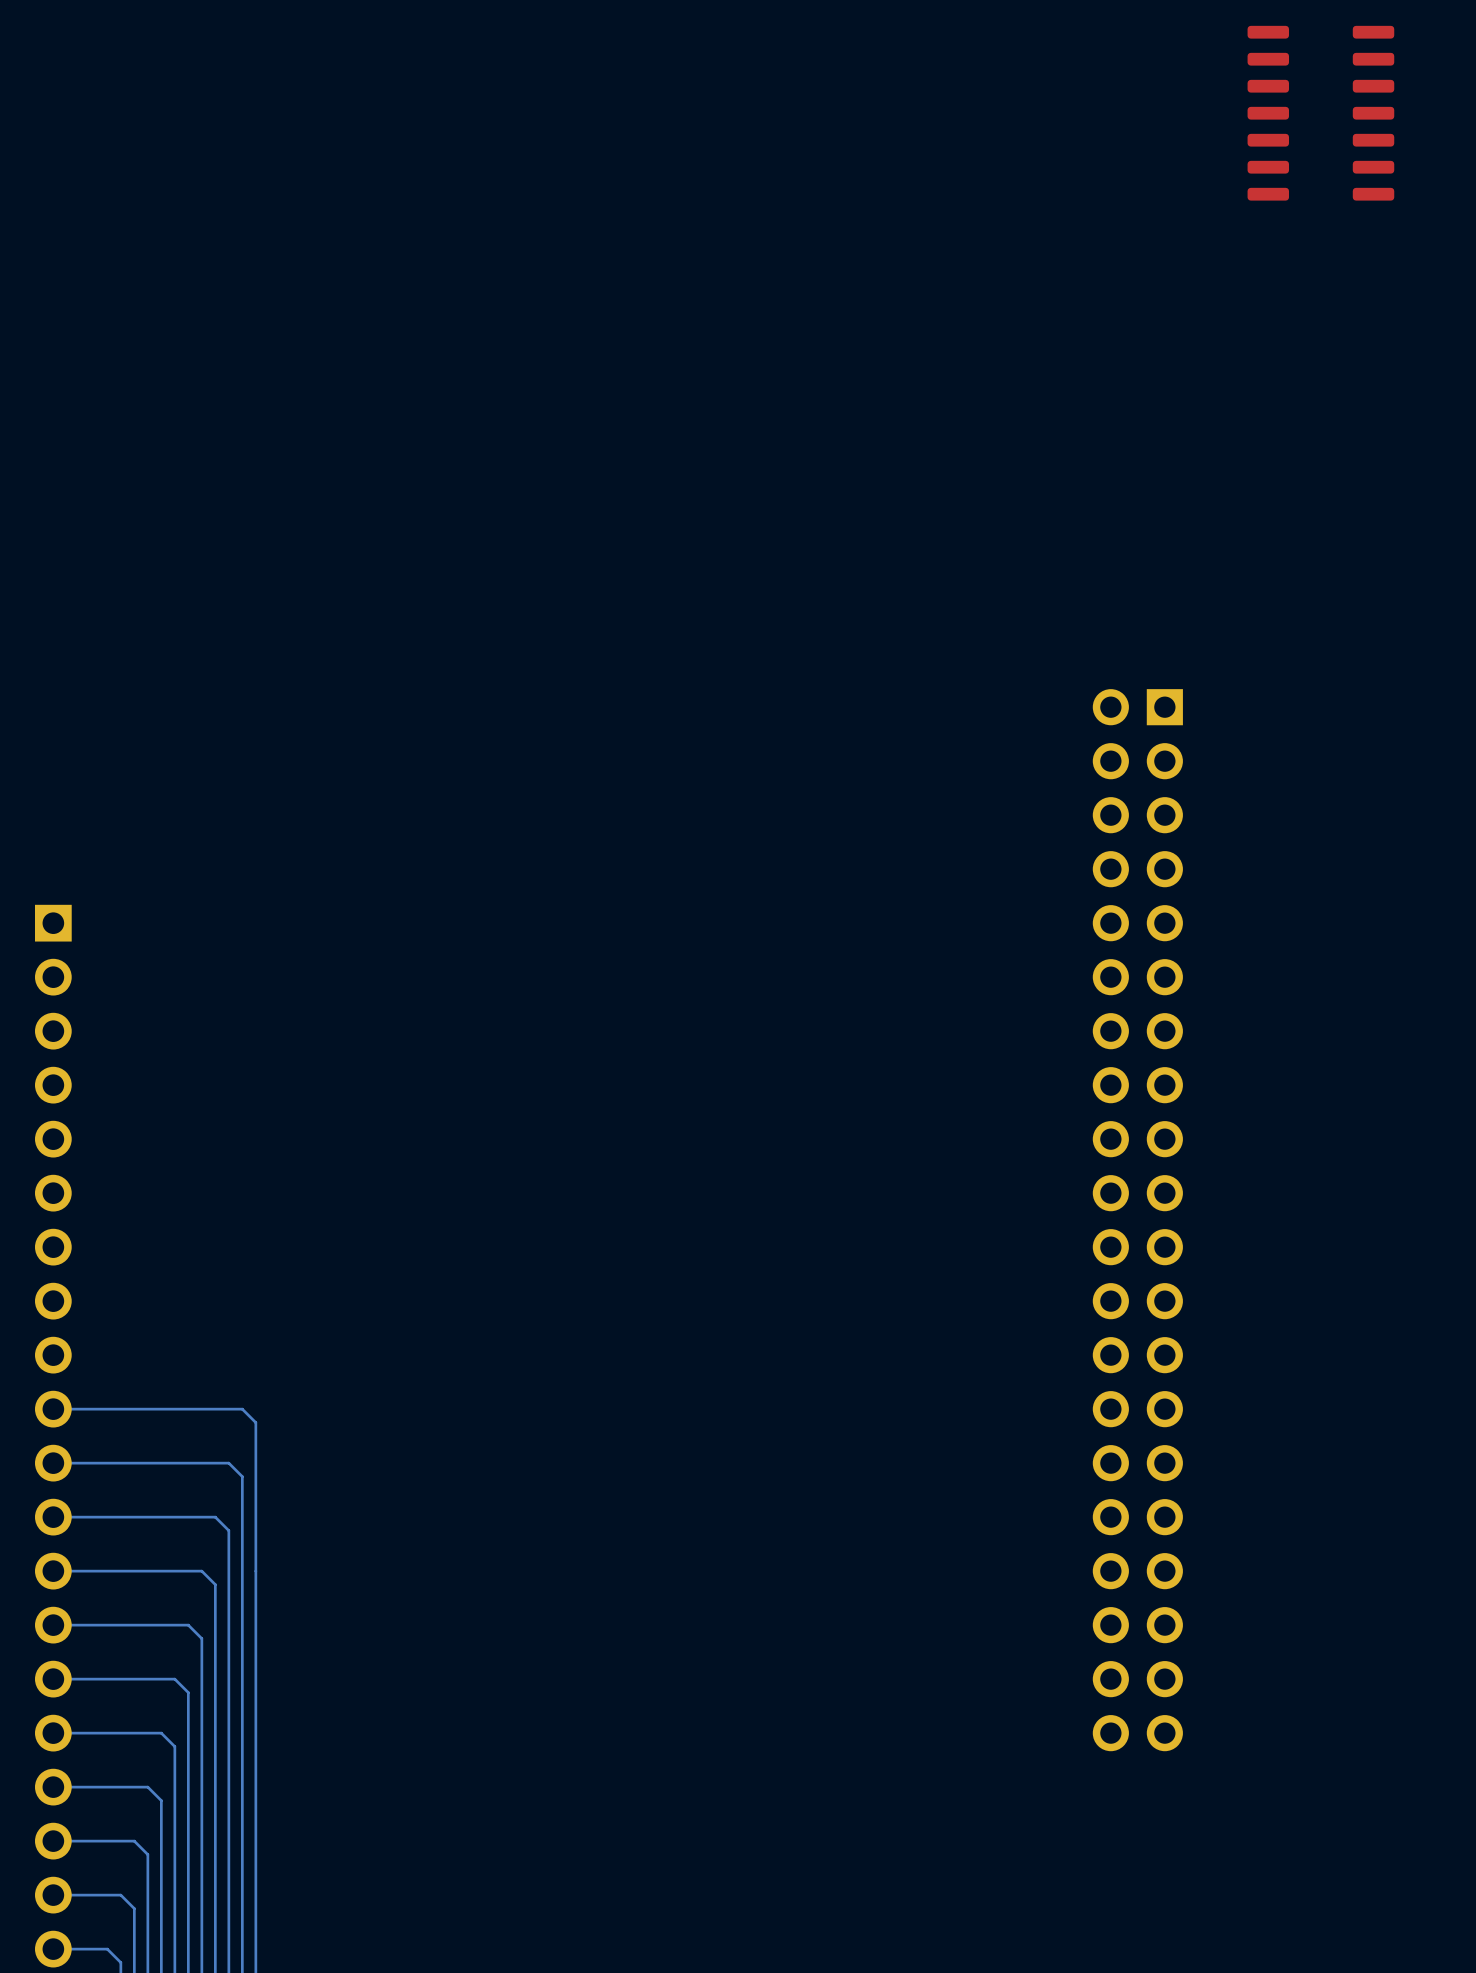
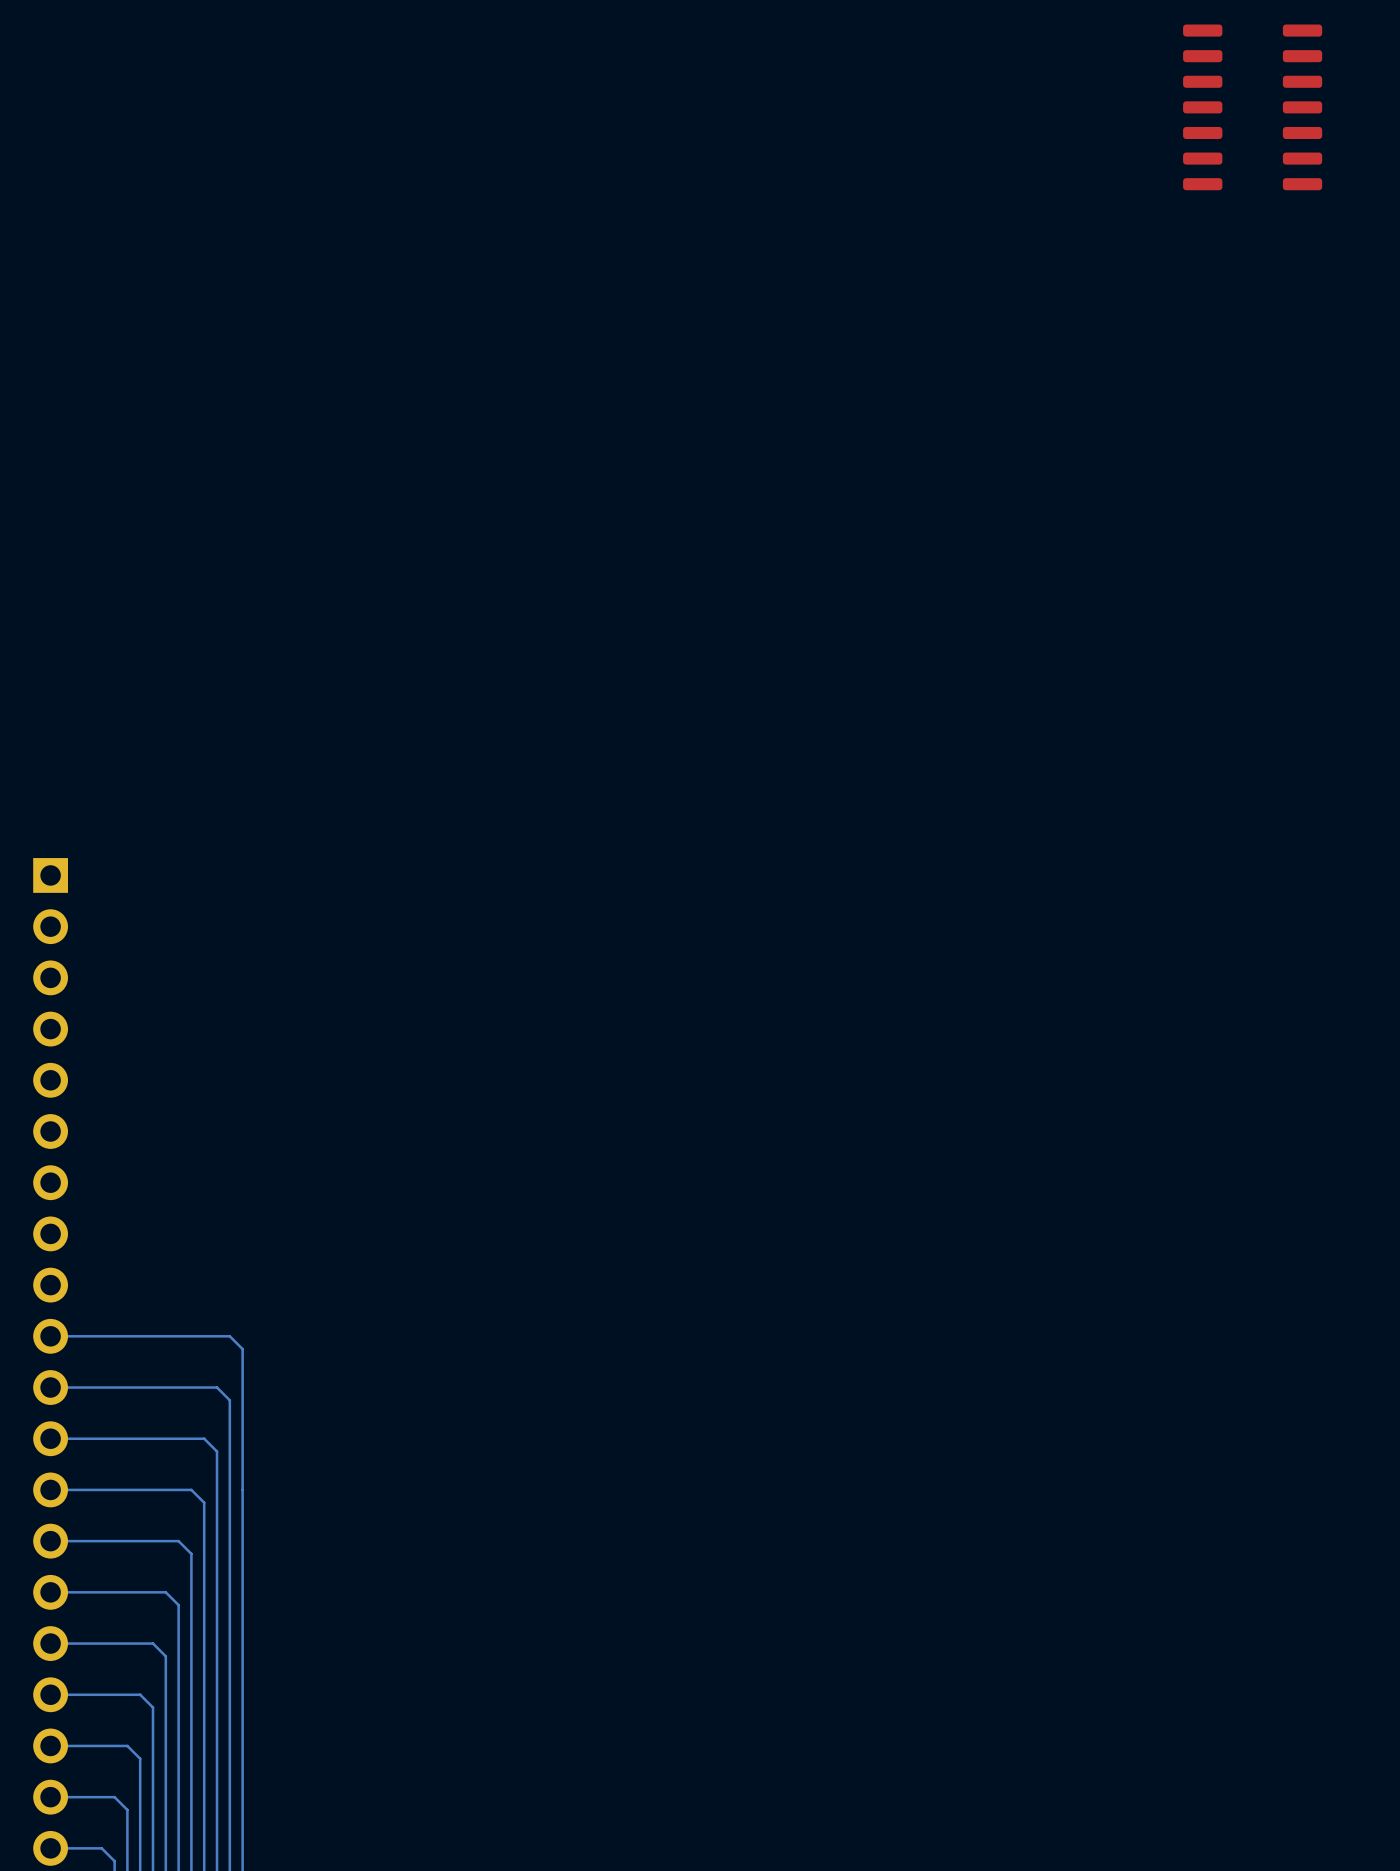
part: (1137, 1220) -> none

